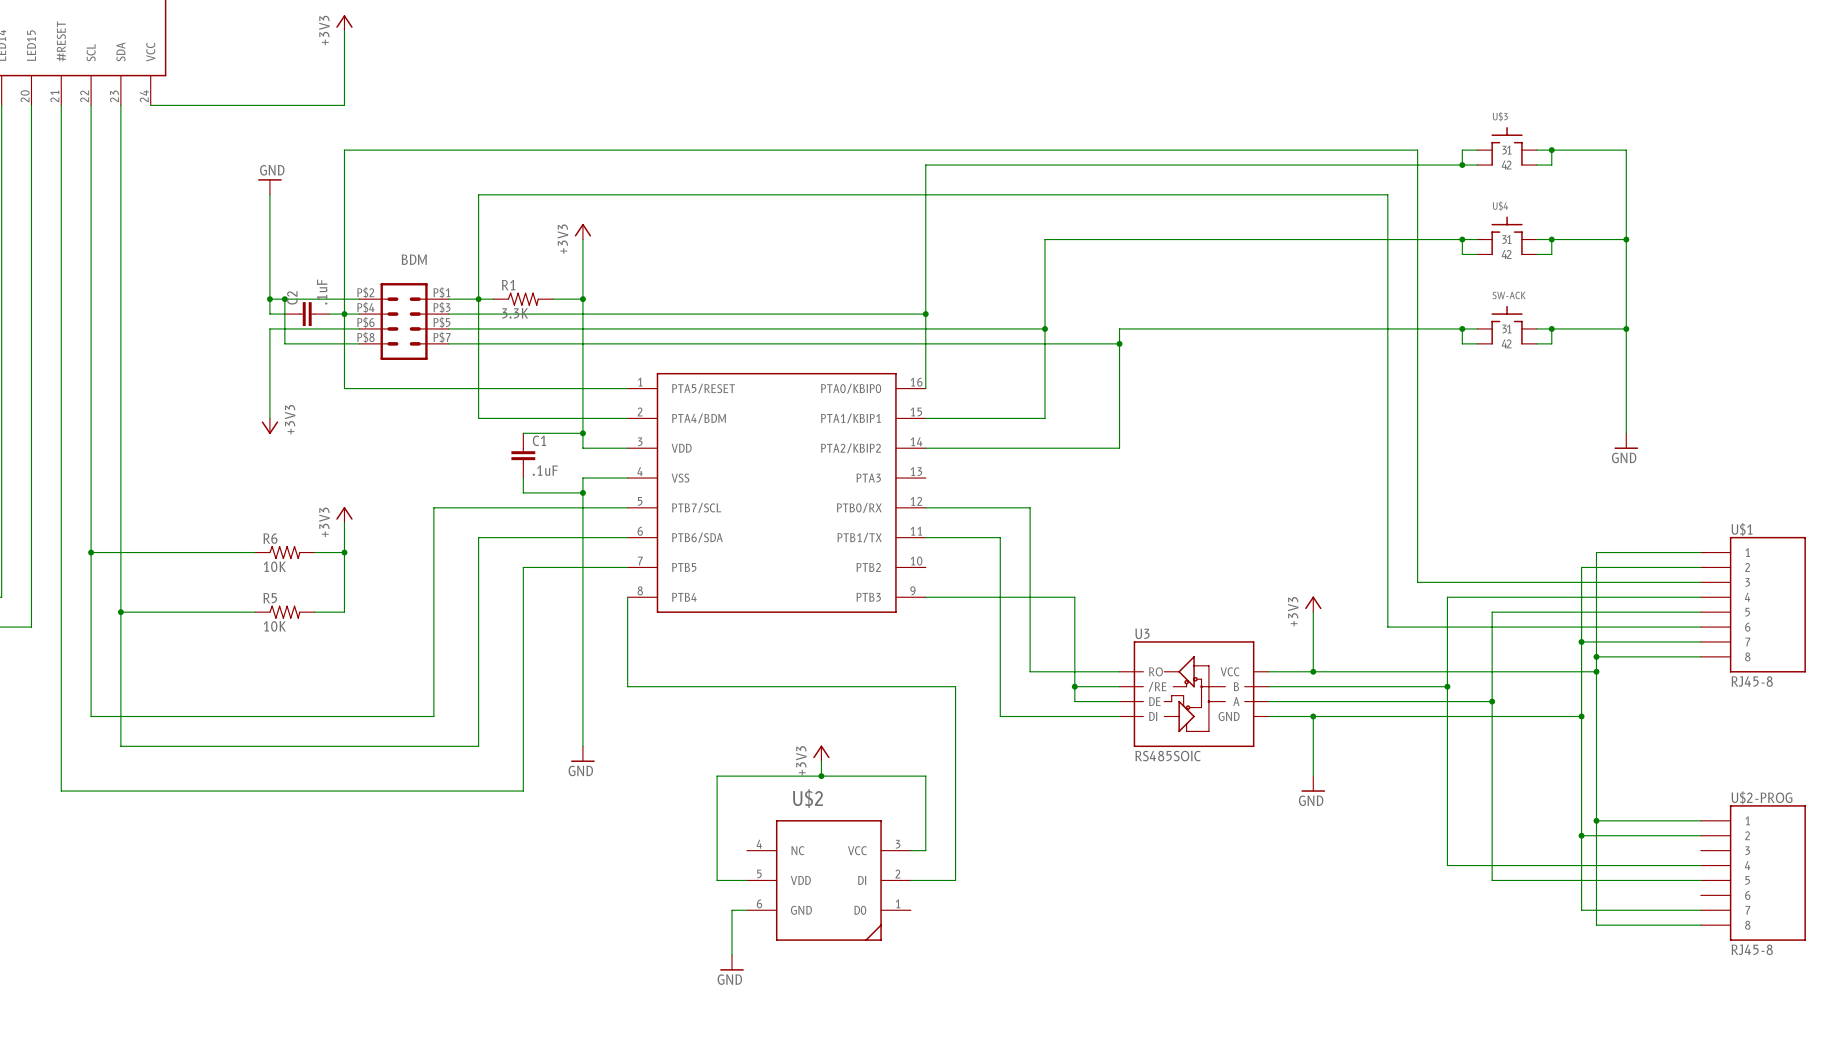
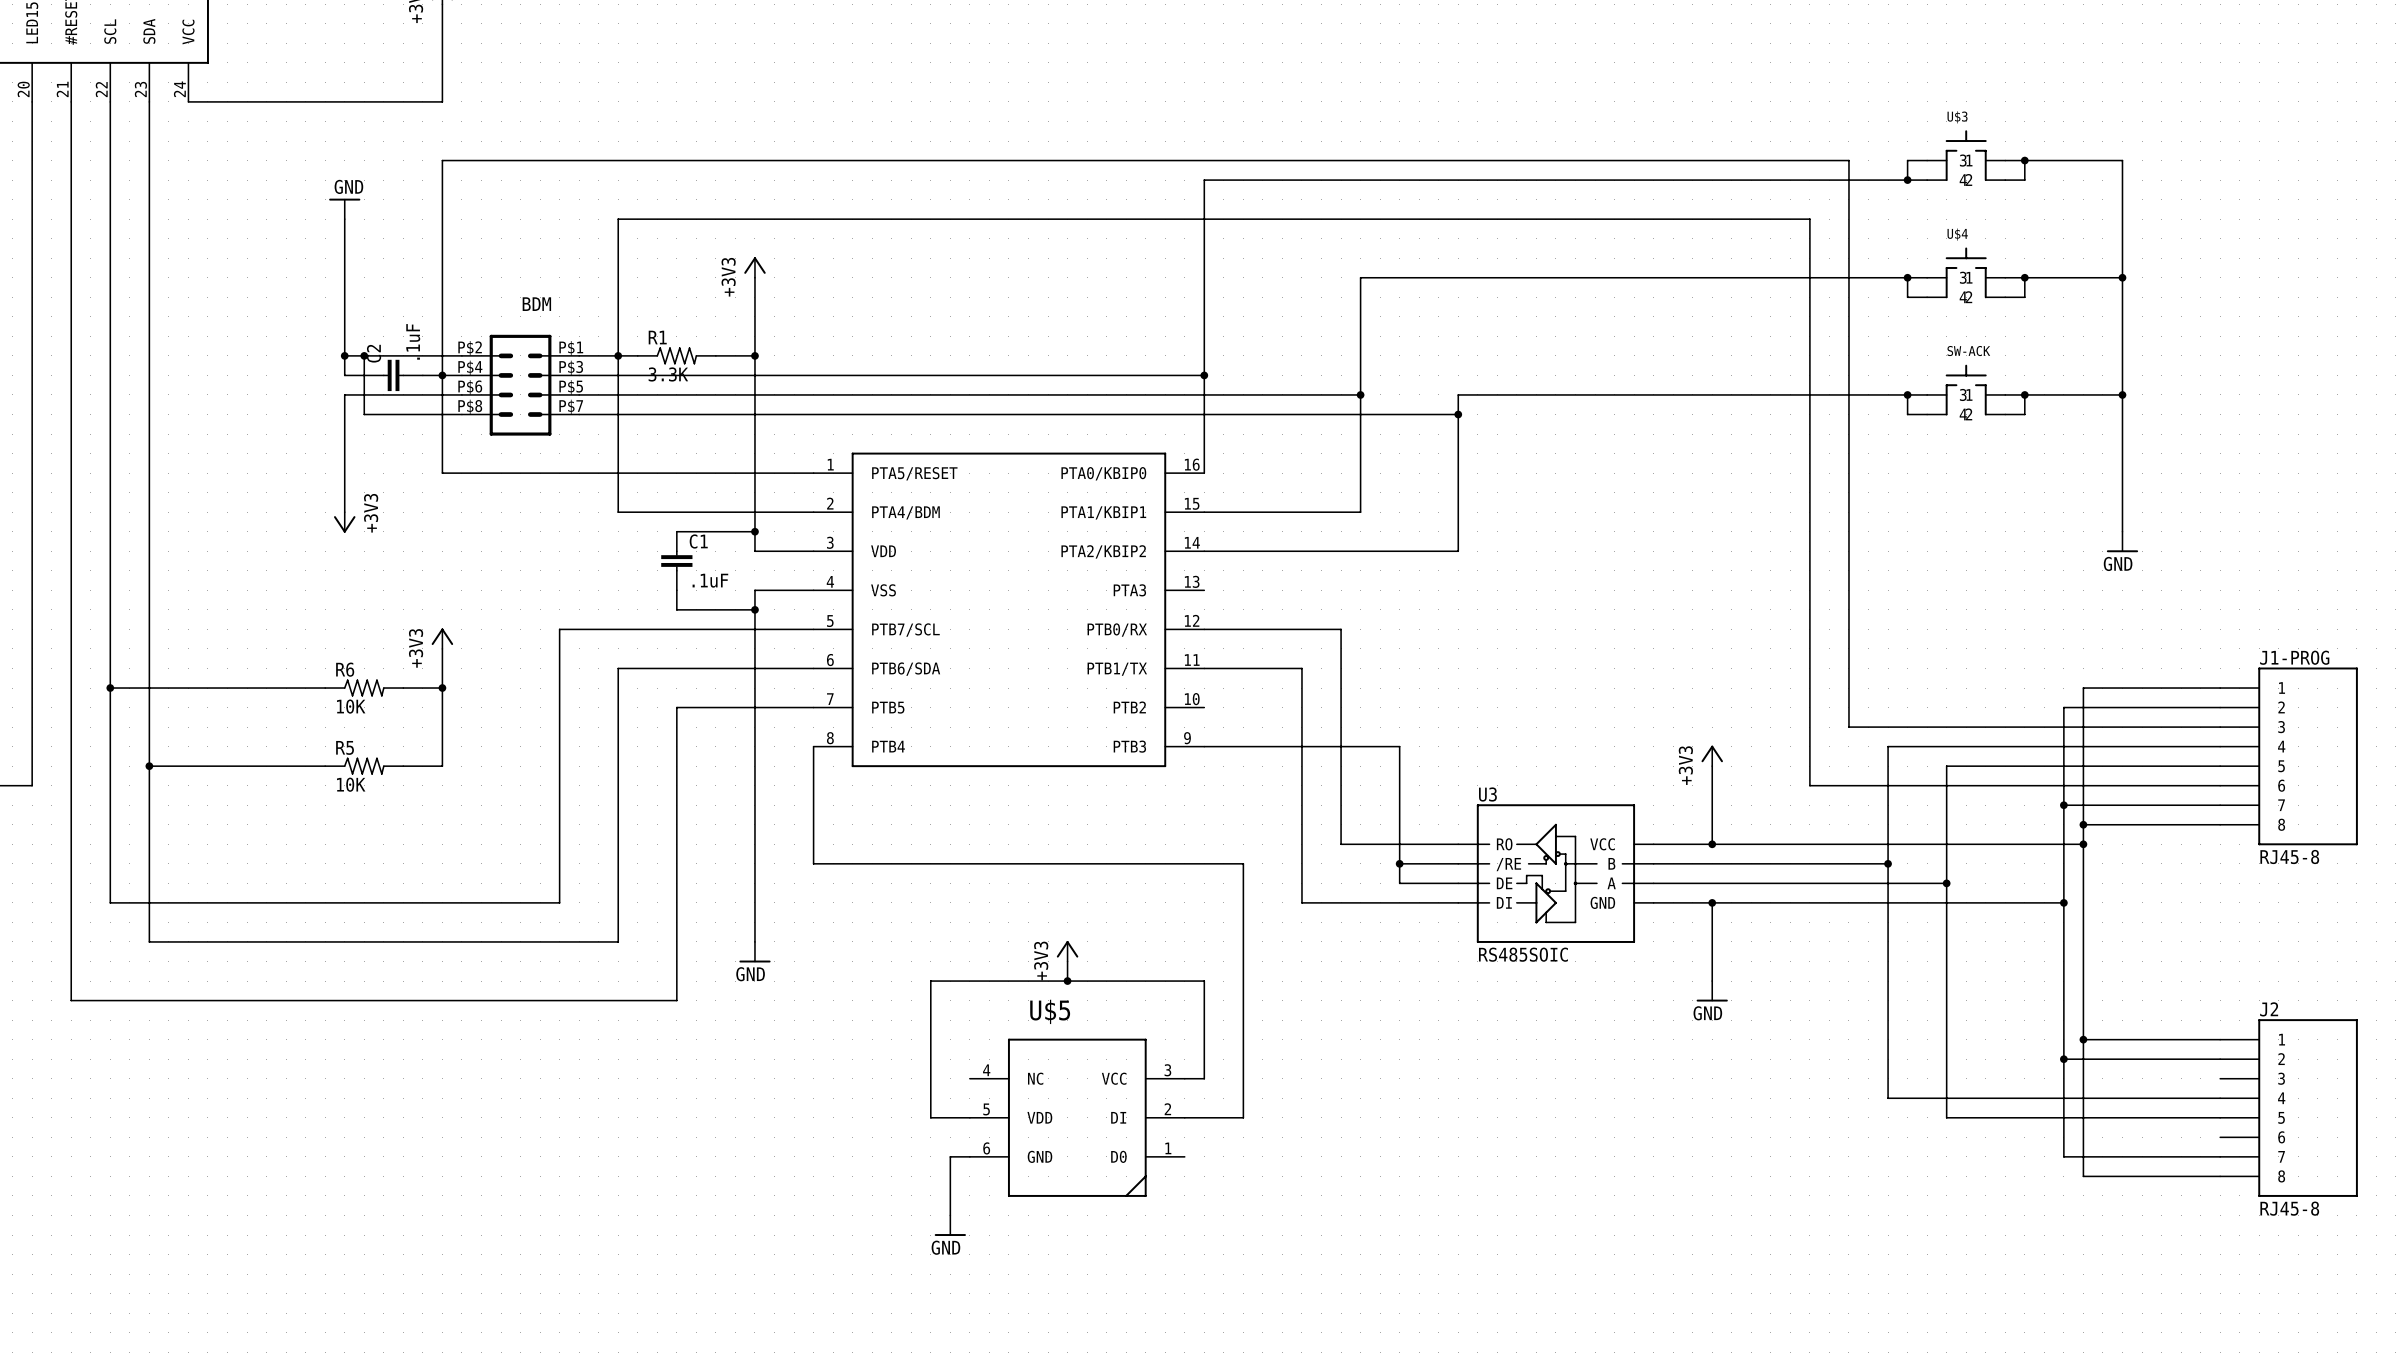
U$1 name: U$1 (1742, 529) -> J1-PROG (2294, 657)
U$2-PROG name: U$2-PROG (1761, 797) -> J2 (2269, 1009)
U$2 name: U$2 (807, 798) -> U$5 (1050, 1011)

